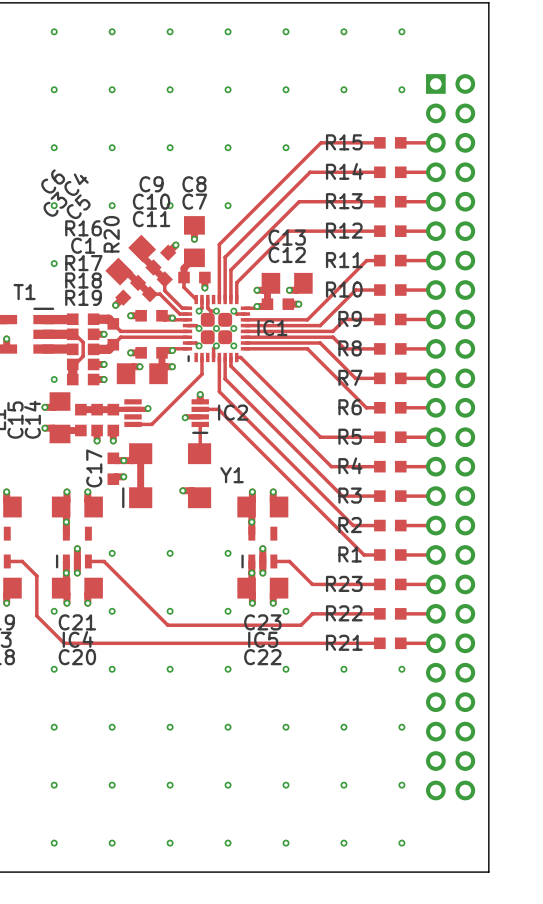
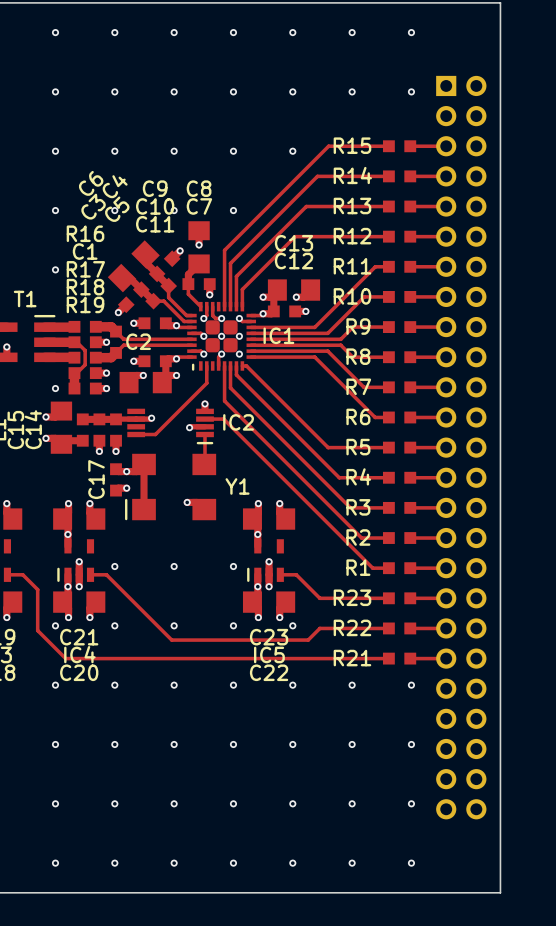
C6 name position: C6 (53, 181) -> C6 (91, 183)
C4 name position: C4 (76, 184) -> C4 (115, 186)
C3 name position: C3 (55, 204) -> C3 (93, 206)
C5 name position: C5 (78, 206) -> C5 (117, 209)
R20 name: R20 (111, 234) -> C2 (138, 341)

